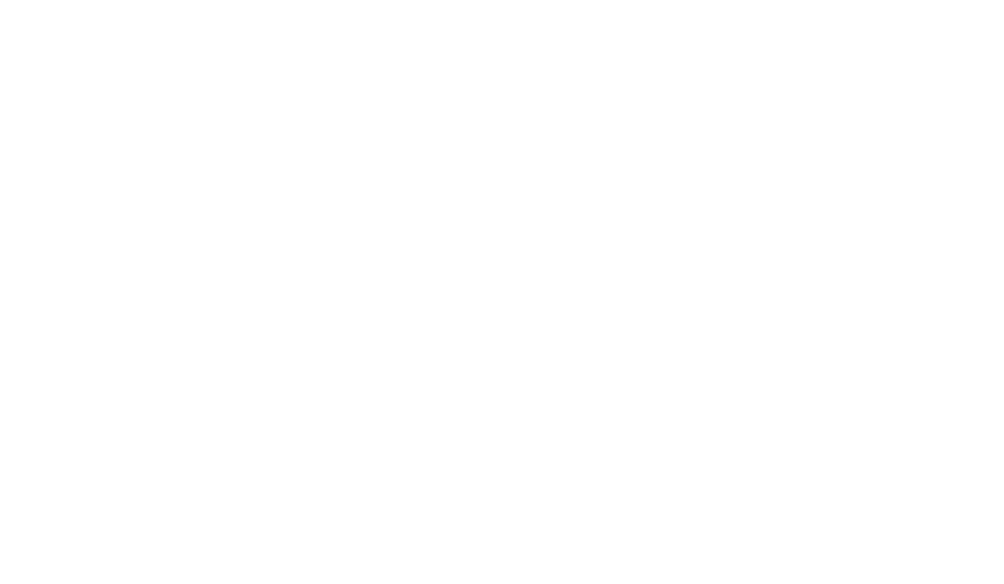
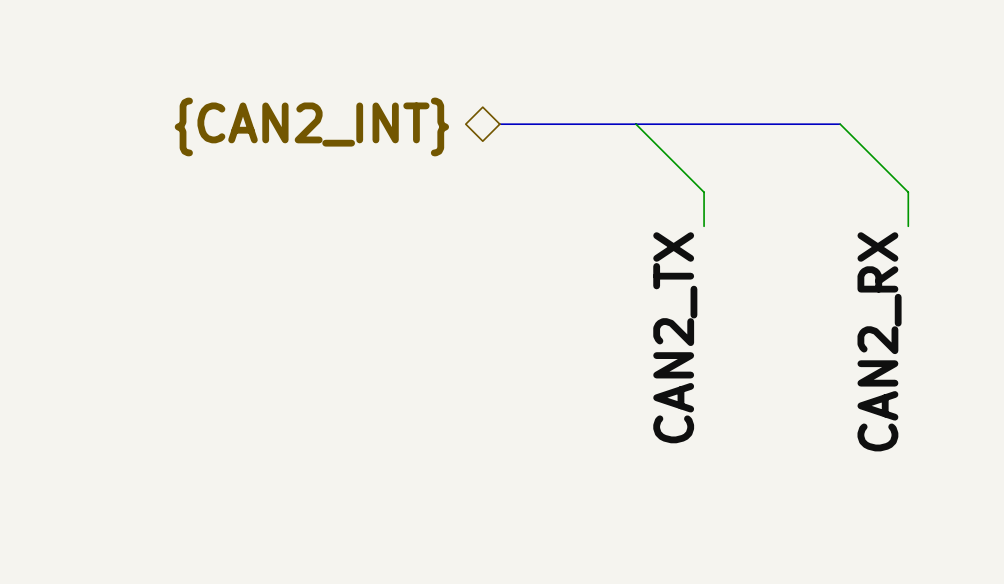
bus: none -> (499, 124) (840, 124)
wire: none -> (635, 124) (704, 192) (704, 226)
wire: none -> (840, 124) (908, 192) (908, 226)
hierarchical label: none -> {CAN2_INT} (311, 126)
label: none -> CAN2_TX (675, 337)
label: none -> CAN2_RX (879, 341)

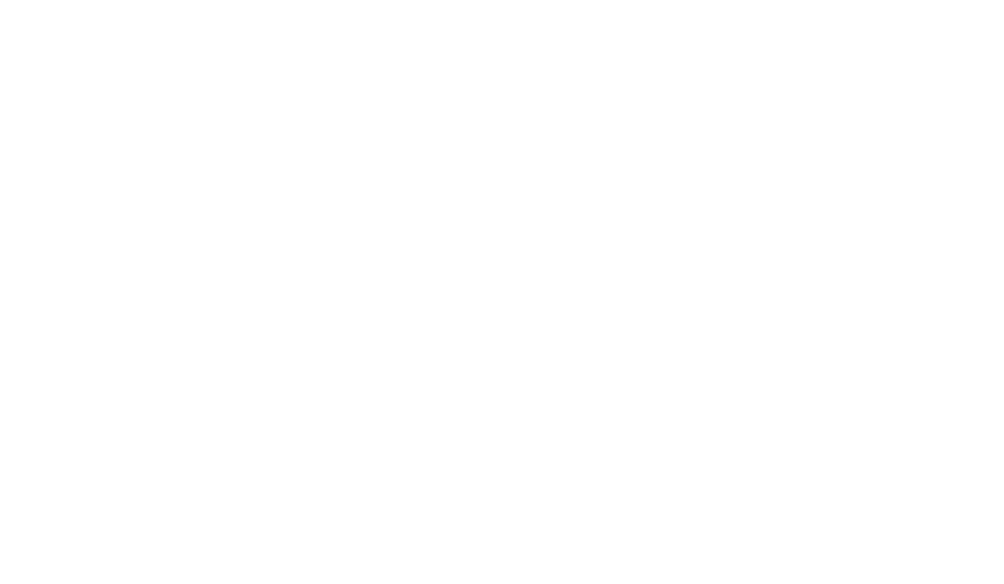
bus: (499, 124) (840, 124) -> none
wire: (635, 124) (704, 192) (704, 226) -> none
wire: (840, 124) (908, 192) (908, 226) -> none
hierarchical label: {CAN2_INT} (311, 126) -> none
label: CAN2_TX (675, 337) -> none
label: CAN2_RX (879, 341) -> none

